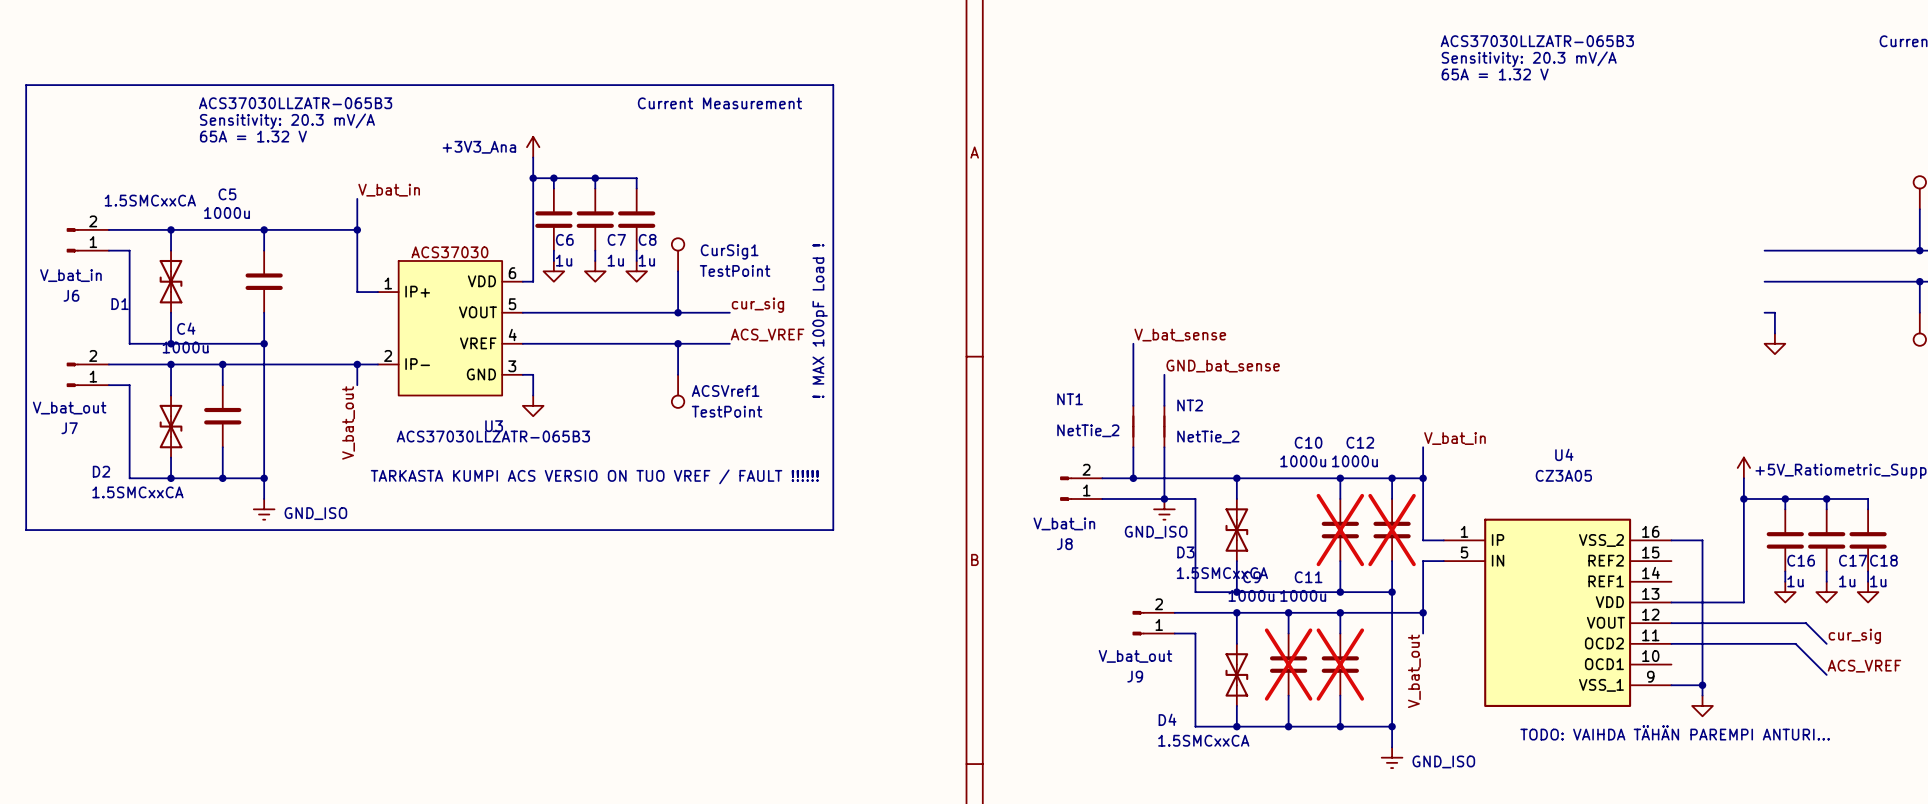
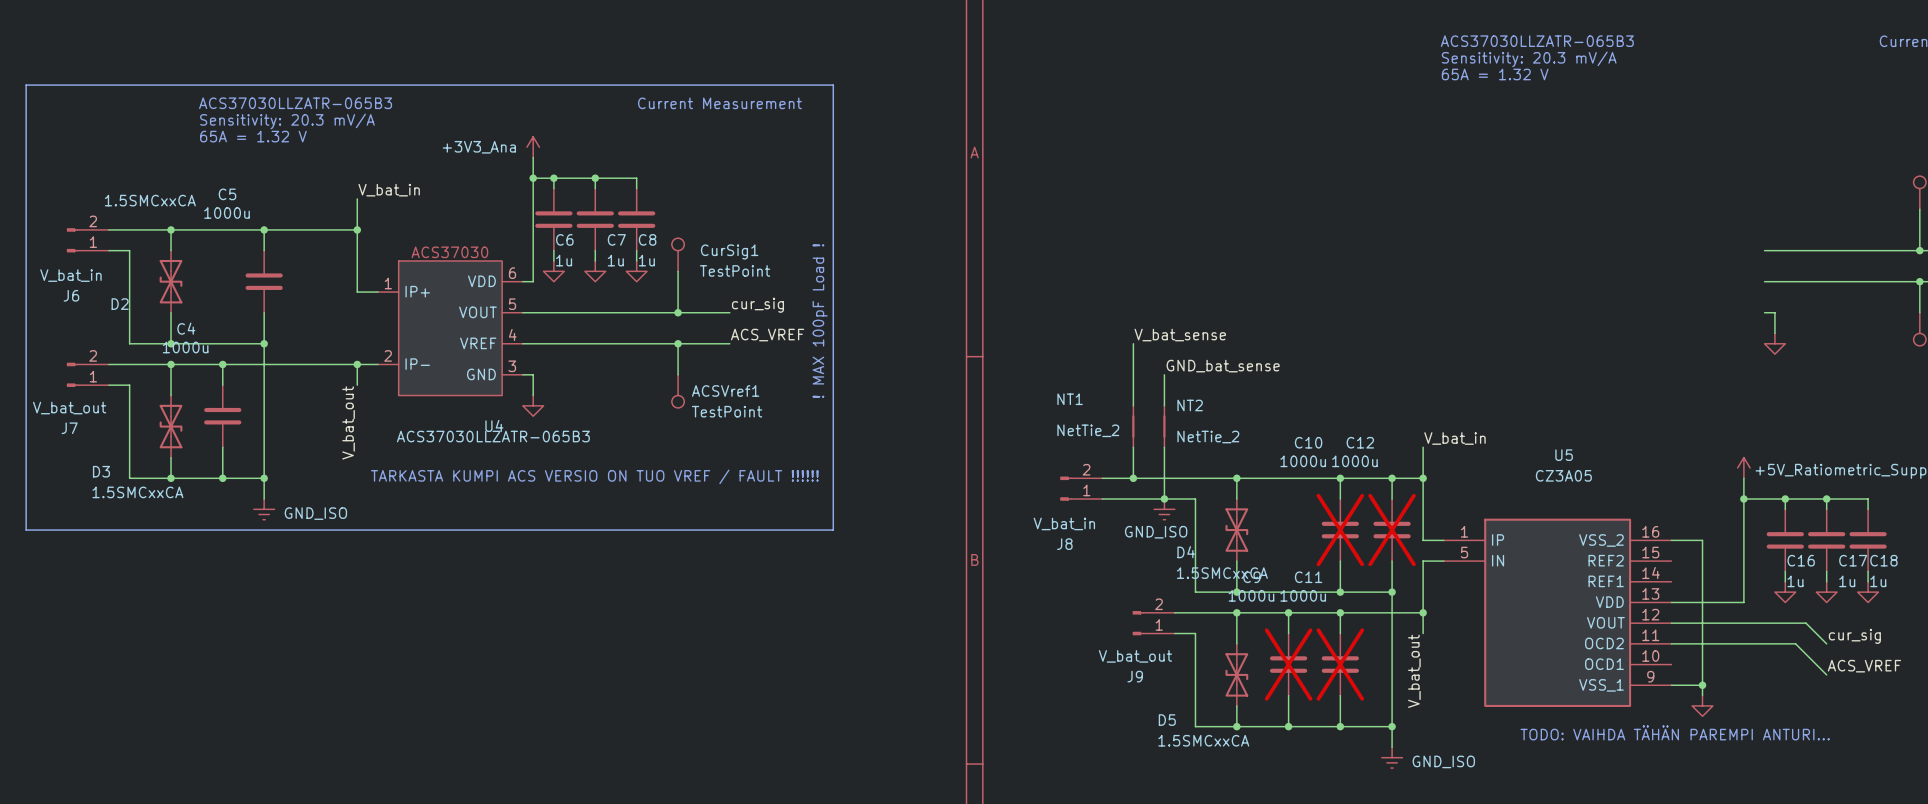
D1 name: D1 (120, 304) -> D2 (120, 304)
U3 name: U3 (494, 426) -> U4 (494, 425)
U4 name: U4 (1564, 454) -> U5 (1564, 455)
D2 name: D2 (101, 471) -> D3 (101, 471)
D3 name: D3 (1185, 552) -> D4 (1186, 552)
D4 name: D4 (1167, 719) -> D5 (1167, 720)

